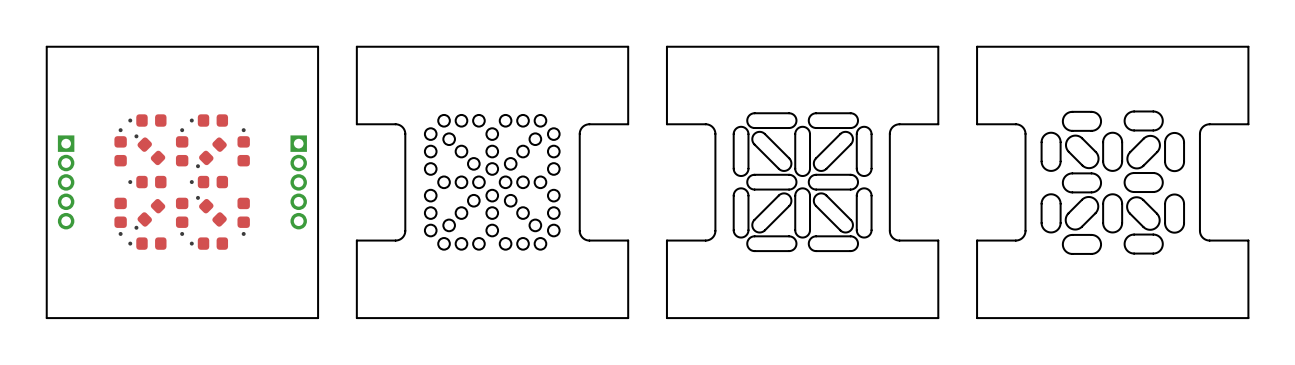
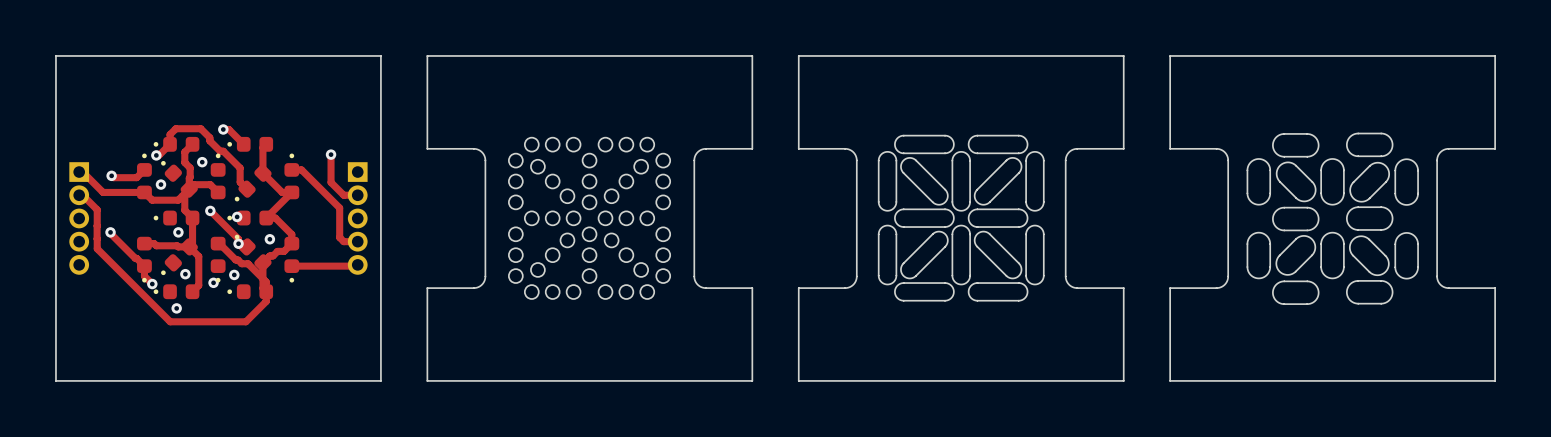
track: none -> (223, 129) (228, 129) (243, 144)
via: none -> (223, 129)
track: none -> (192, 144) (184, 152) (184, 162) (190, 168) (189, 189)
track: none -> (266, 144) (262, 147) (262, 173) (282, 192) (291, 192) (266, 218) (275, 218) (291, 234) (291, 243) (284, 251) (277, 251) (262, 262) (262, 288) (266, 291)
track: none -> (156, 155) (158, 155) (170, 144) (170, 134) (175, 128) (200, 128) (220, 151) (223, 151) (240, 168) (240, 182) (247, 189)
via: none -> (156, 155)
track: none -> (331, 154) (331, 182) (343, 195) (357, 195)
via: none -> (331, 154)
via: none -> (202, 162)
track: none -> (144, 169) (136, 177) (113, 177) (111, 175)
track: none -> (291, 169) (301, 169) (339, 208) (339, 237) (343, 241) (357, 241)
track: none -> (79, 172) (82, 172) (103, 192) (144, 192) (152, 200) (178, 200) (193, 184) (210, 184) (218, 192)
via: none -> (111, 175)
via: none -> (160, 184)
track: none -> (184, 193) (184, 210) (192, 218) (192, 243) (189, 246)
track: none -> (79, 195) (82, 195) (97, 209) (97, 248) (170, 321) (245, 321) (266, 301) (266, 281) (248, 263) (241, 263) (235, 260) (218, 241)
track: none -> (210, 210) (238, 239) (238, 243) (245, 243) (247, 246)
via: none -> (210, 210)
via: none -> (237, 216)
track: none -> (110, 232) (144, 266) (144, 276) (152, 284)
via: none -> (110, 232)
via: none -> (178, 232)
via: none -> (269, 239)
track: none -> (144, 243) (189, 246)
via: none -> (238, 243)
track: none -> (189, 246) (198, 256) (198, 285) (192, 291)
track: none -> (357, 264) (291, 266)
via: none -> (185, 274)
via: none -> (234, 274)
via: none -> (213, 282)
via: none -> (152, 284)
via: none -> (176, 308)

